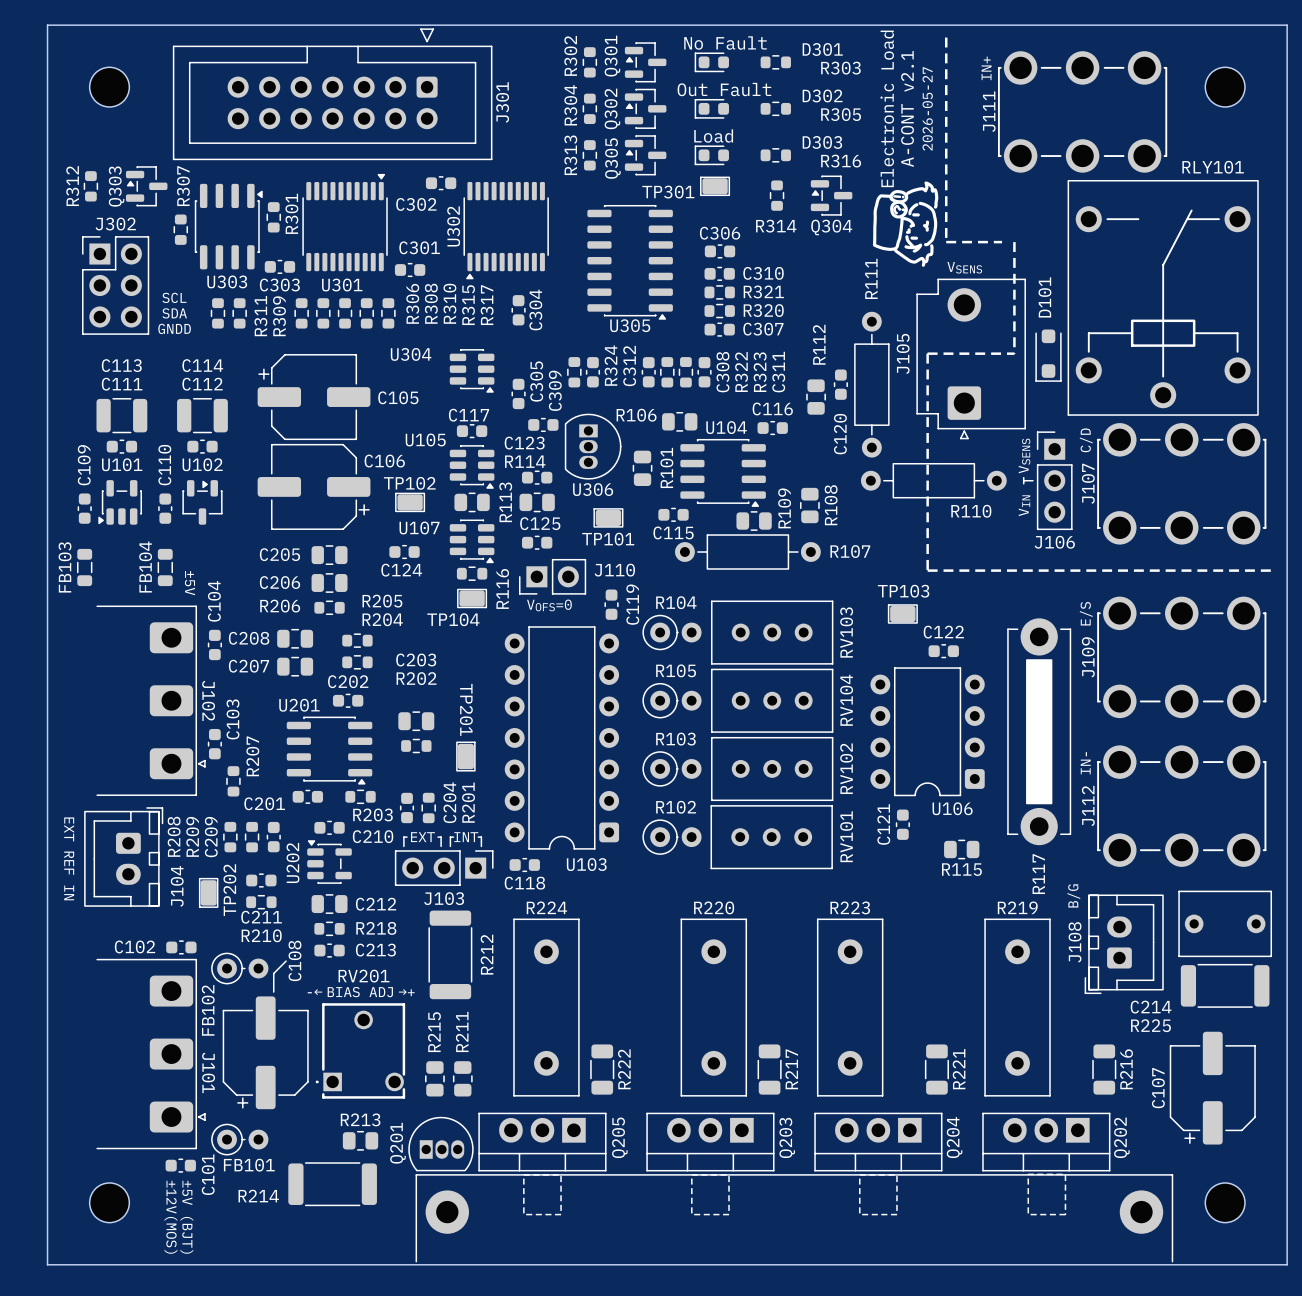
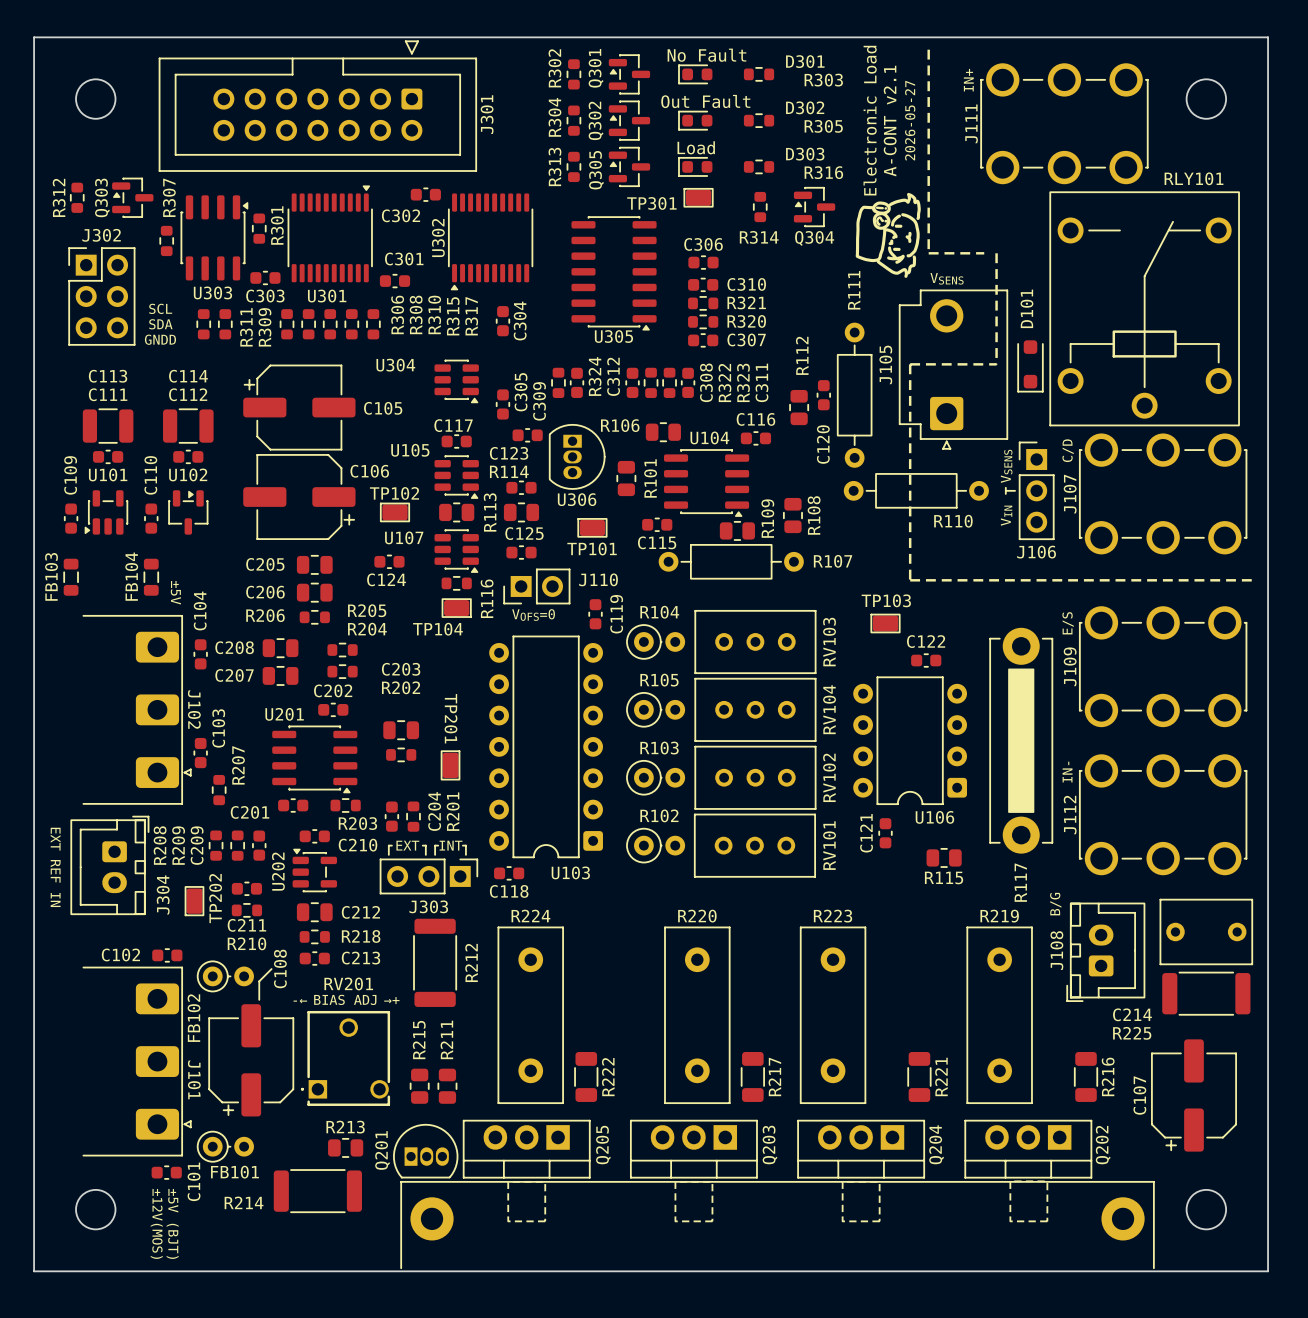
J104 name: J104 (177, 886) -> J304 (163, 894)
J103 name: J103 (444, 898) -> J303 (428, 906)

